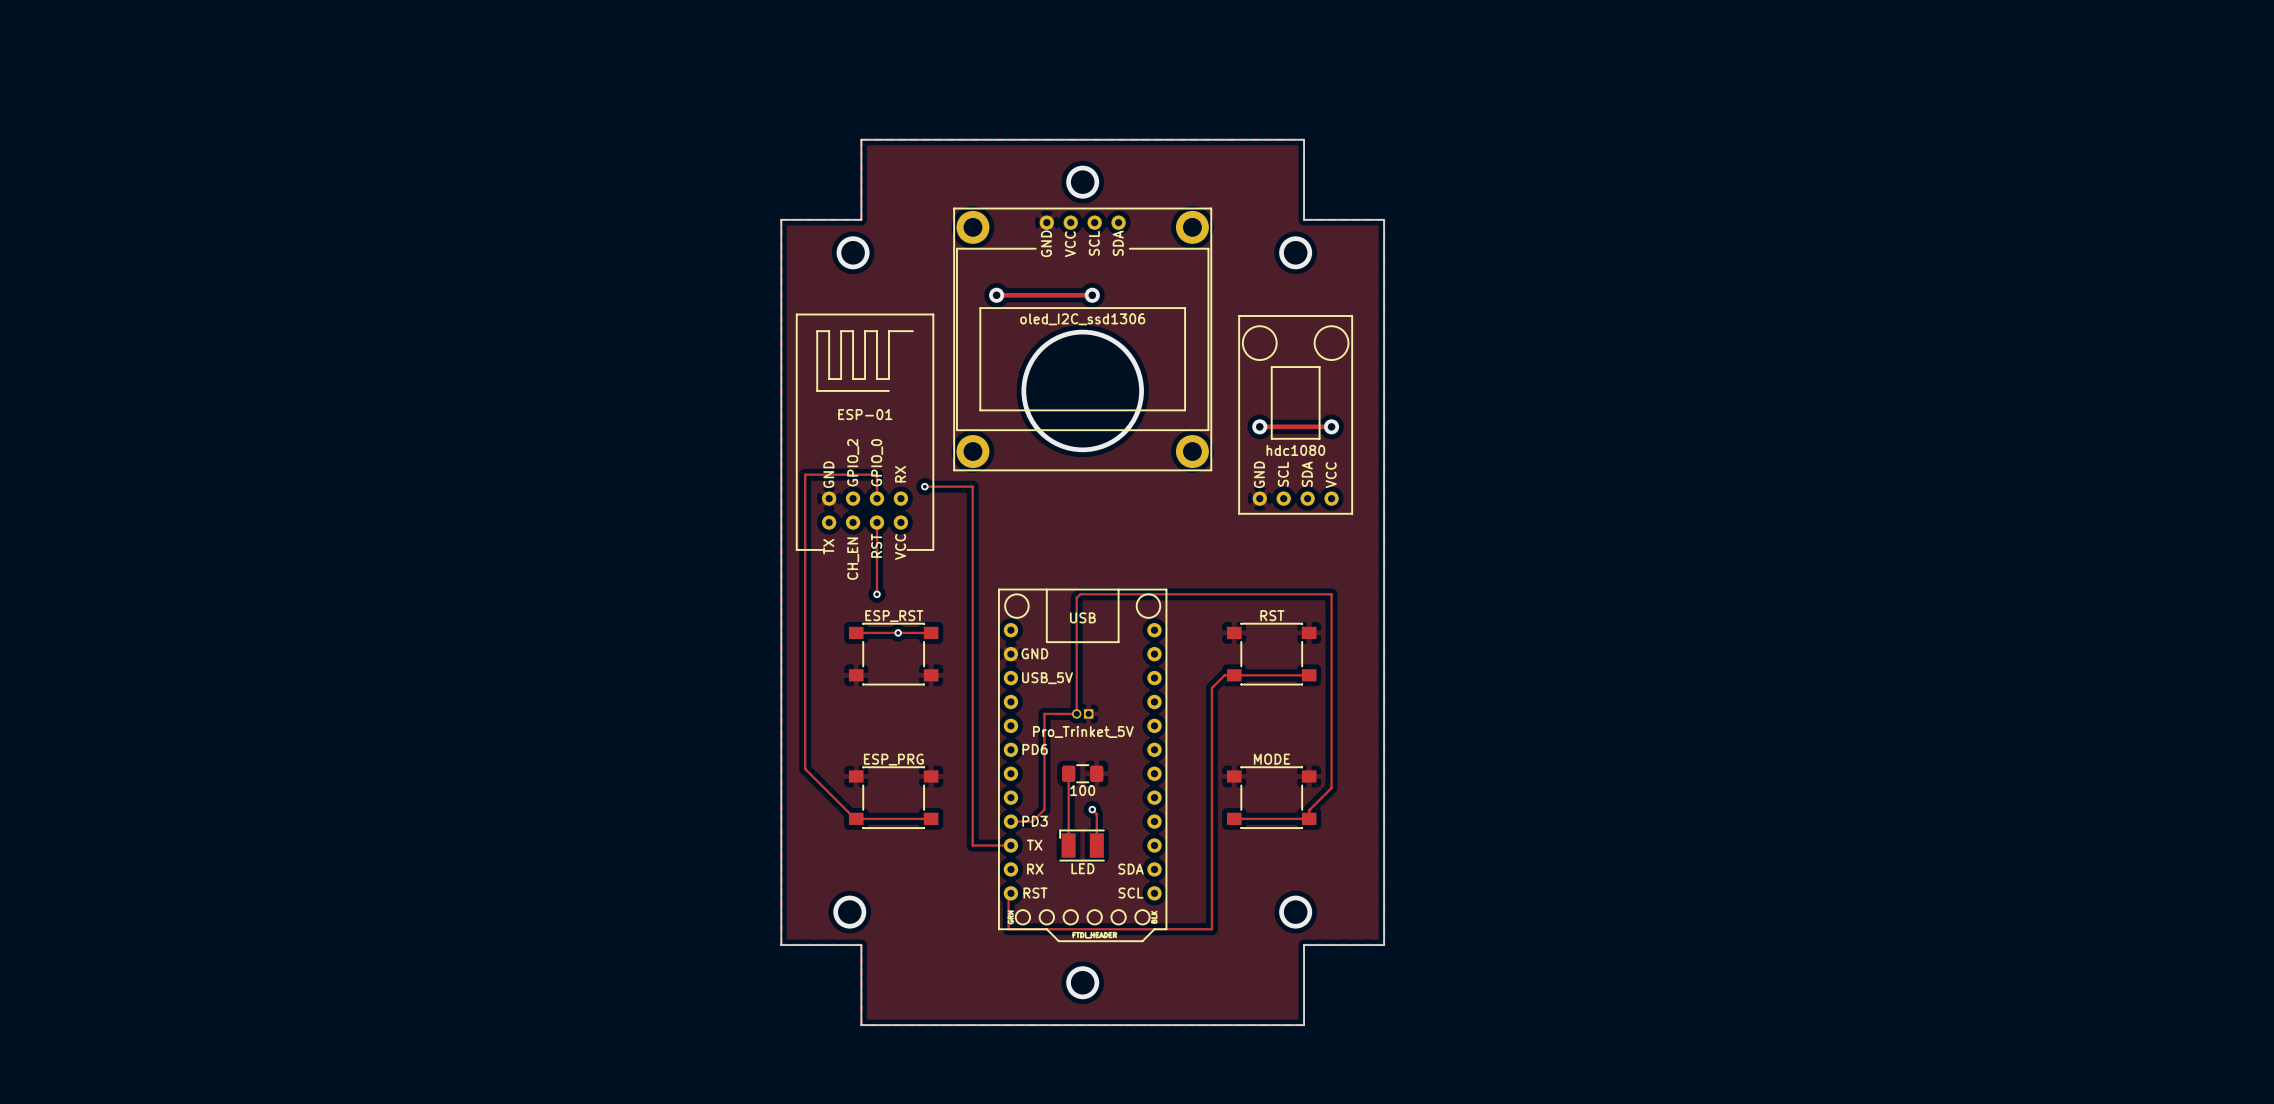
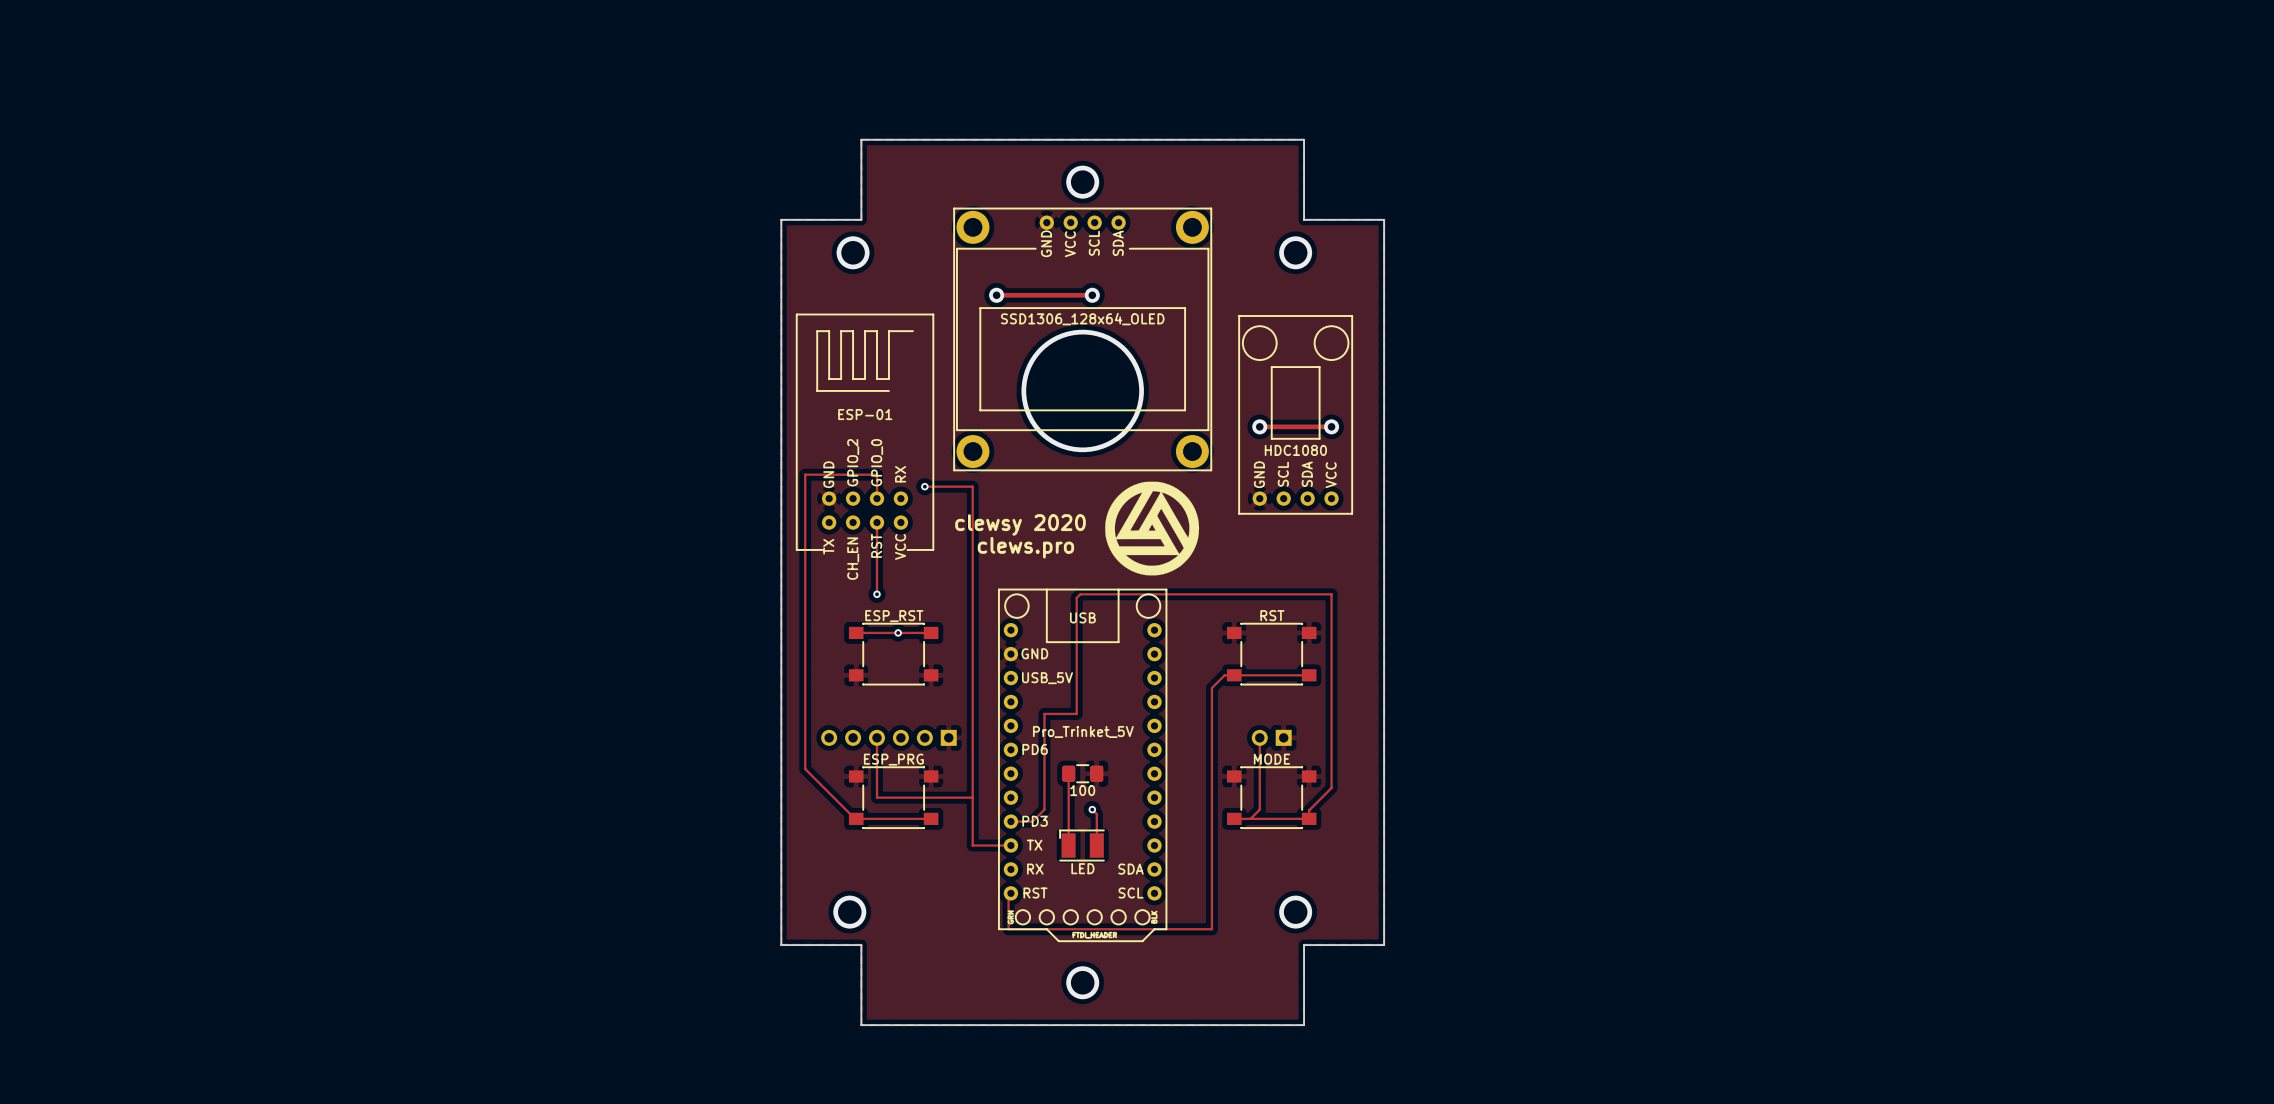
part value: oled_I2C_ssd1306 (1082, 319) -> SSD1306_128x64_OLED (1082, 319)
part value: hdc1080 (1295, 450) -> HDC1080 (1295, 450)
drawing: none -> [1105, 481, 1200, 576]
text: none -> clewsy 2020 (1020, 524)
text: none -> clews.pro (1025, 547)
part: (1082, 713) -> none
track: none -> (877, 737) (877, 797) (972, 797)
part: none -> (888, 737)
track: none -> (1259, 737) (1259, 809) (1250, 818)
part: none -> (1271, 737)

